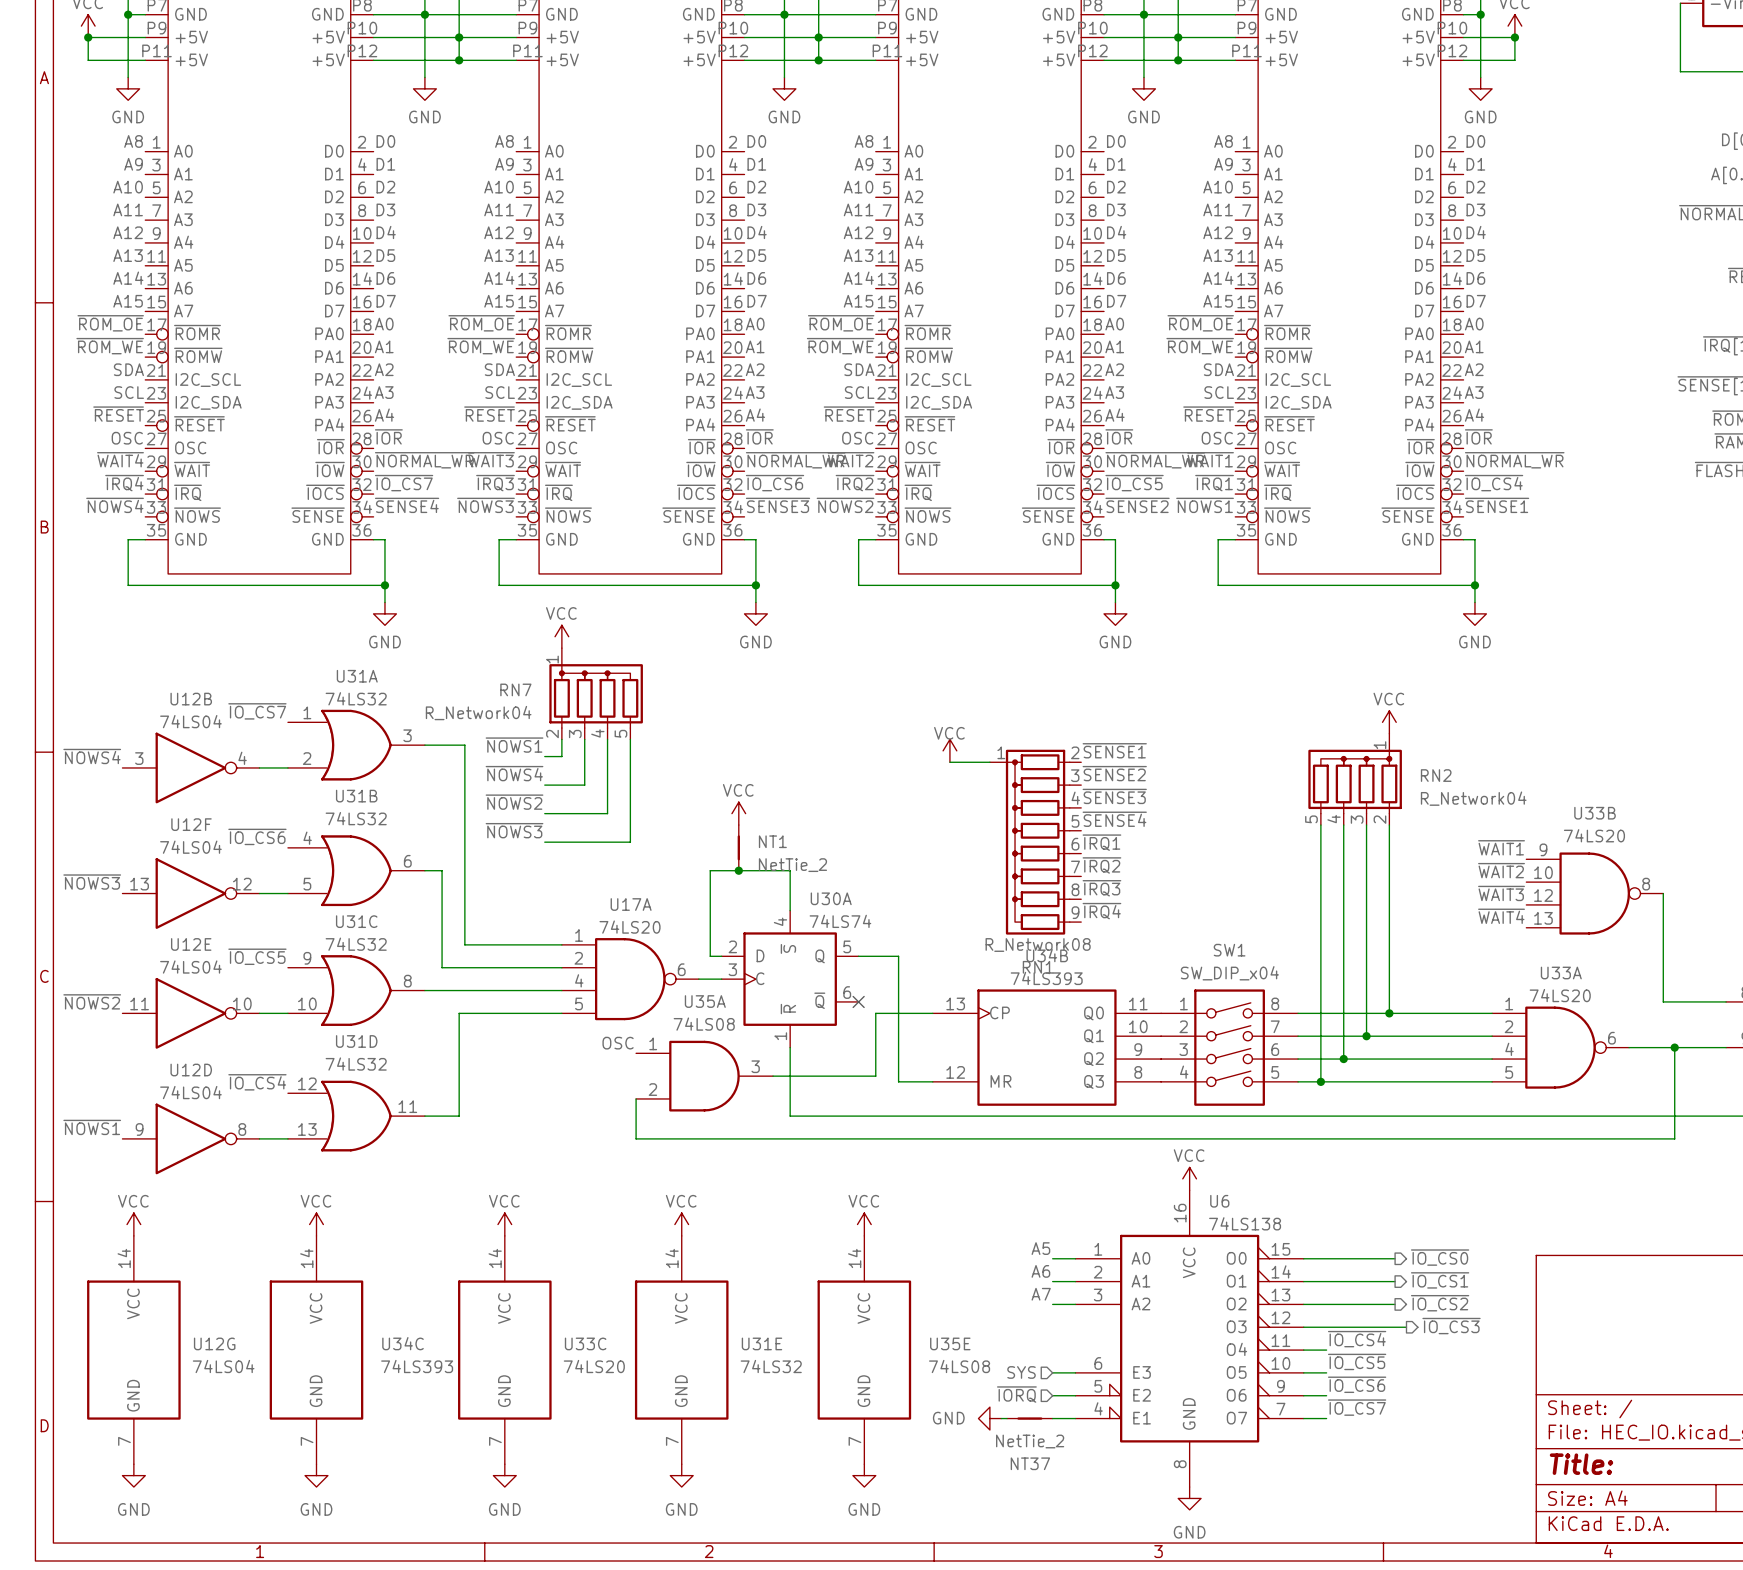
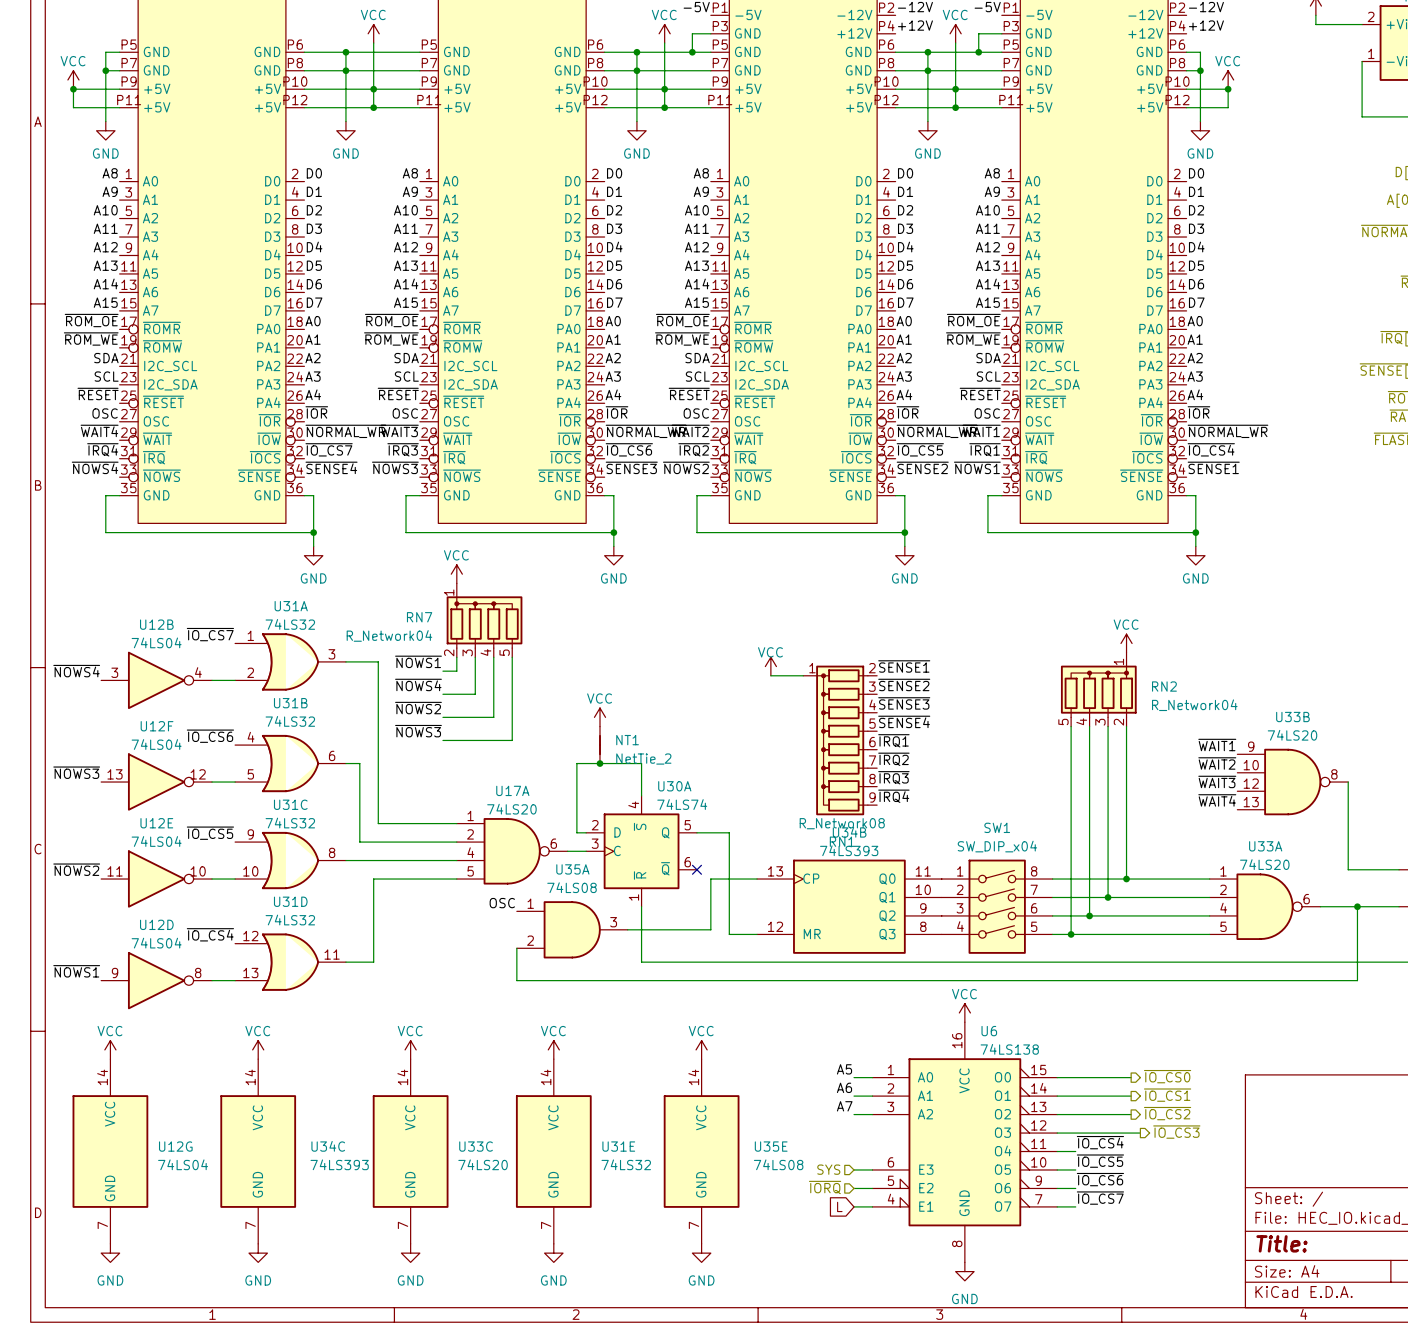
power symbol: GND (989, 1418) -> none
wire: (1001, 1418) (1007, 1418) -> none
NT37: NetTie_2 (1029, 1418) -> none
global label: none -> L (839, 1206)

